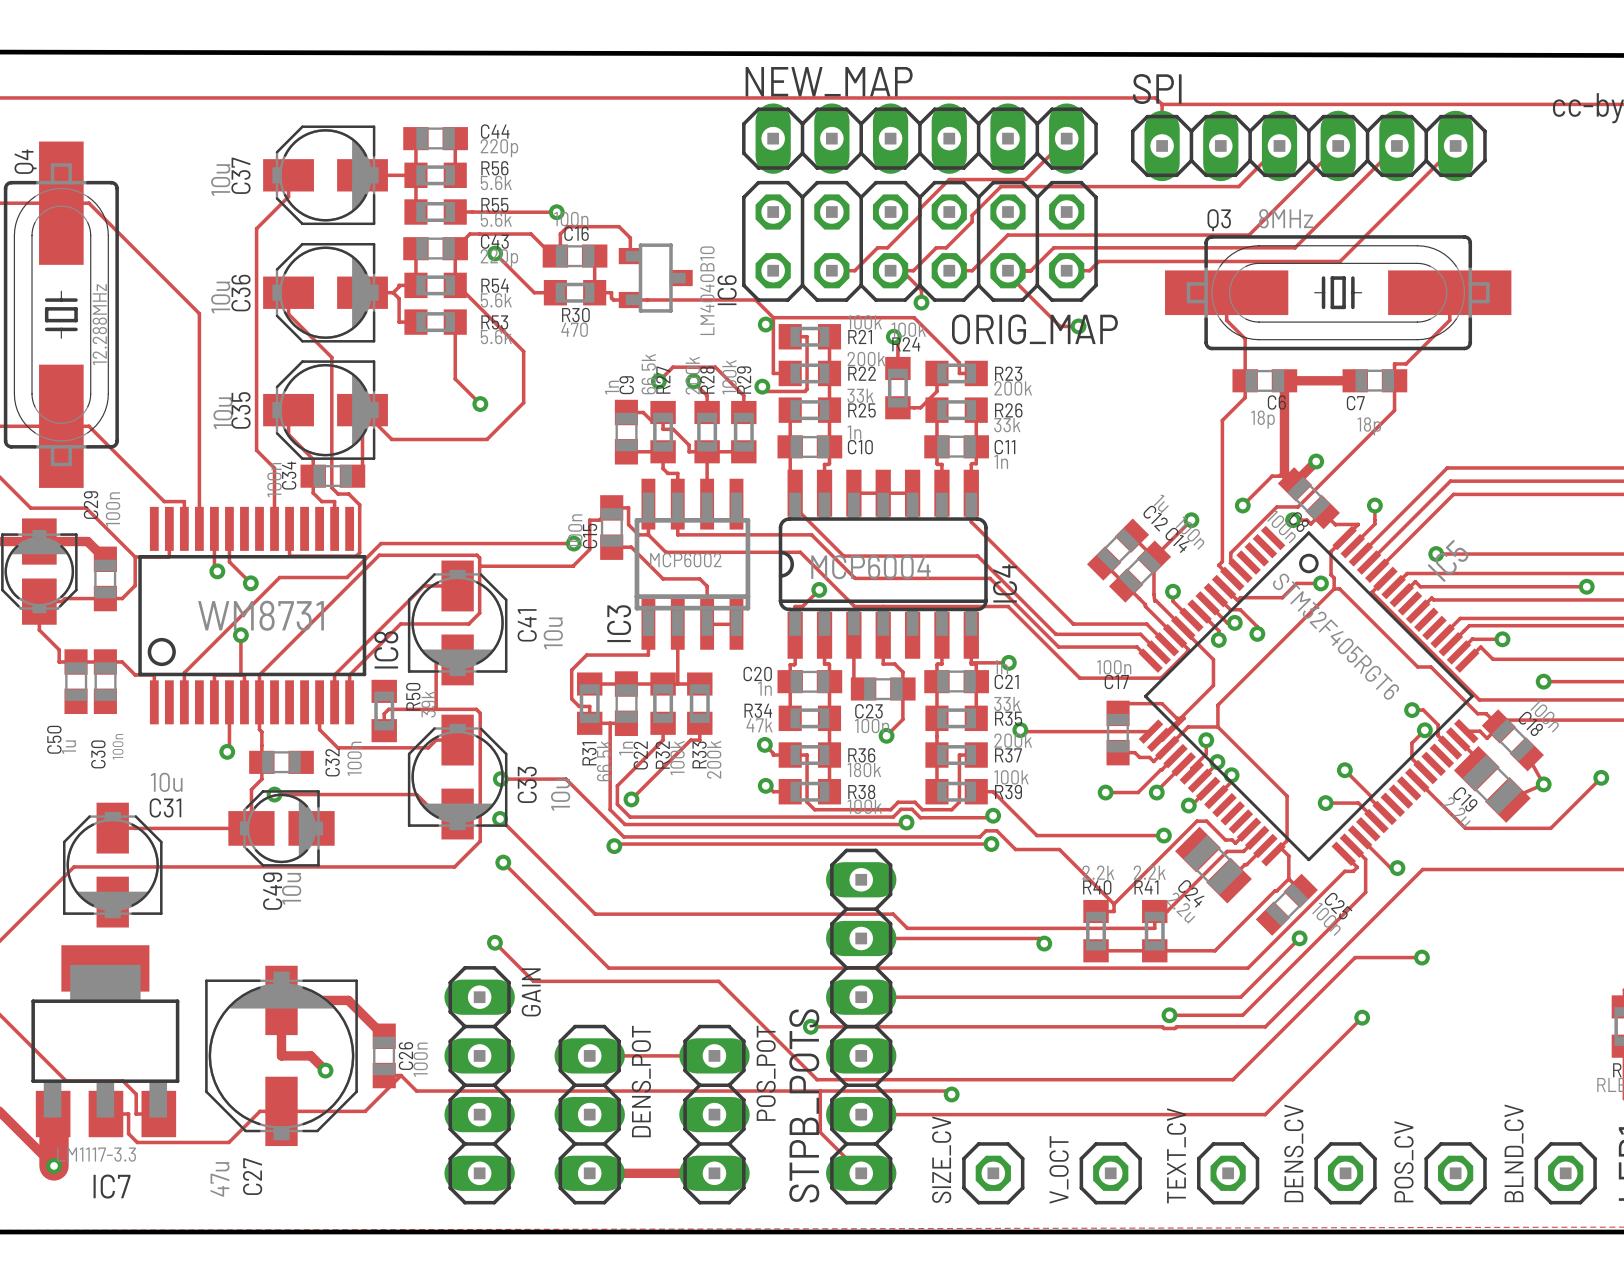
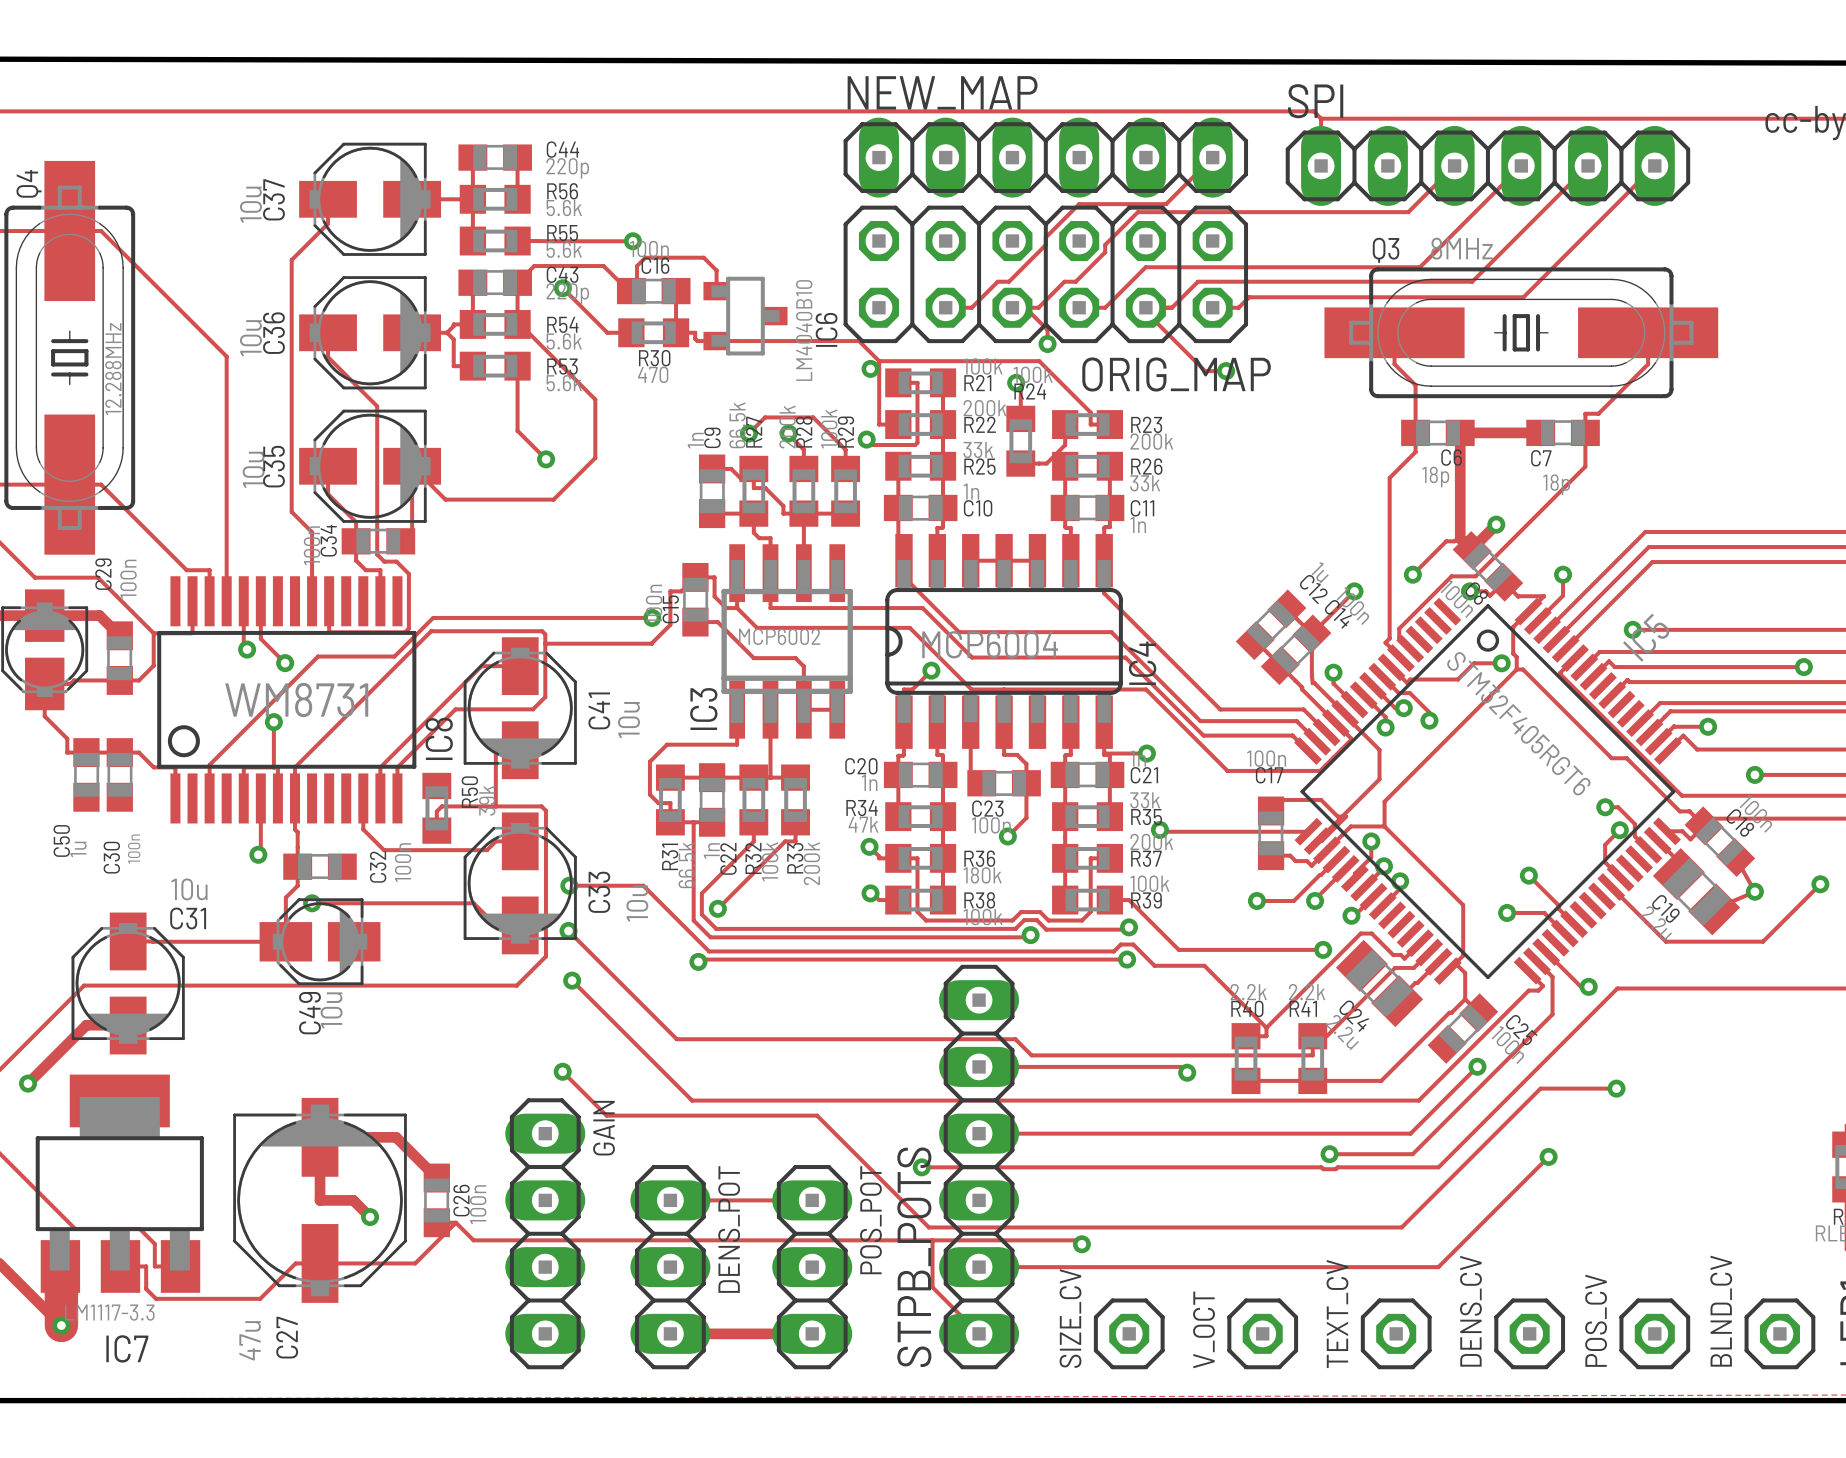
track: none -> (127, 1025) (86, 1025) (28, 1083)
via: none -> (28, 1083)

